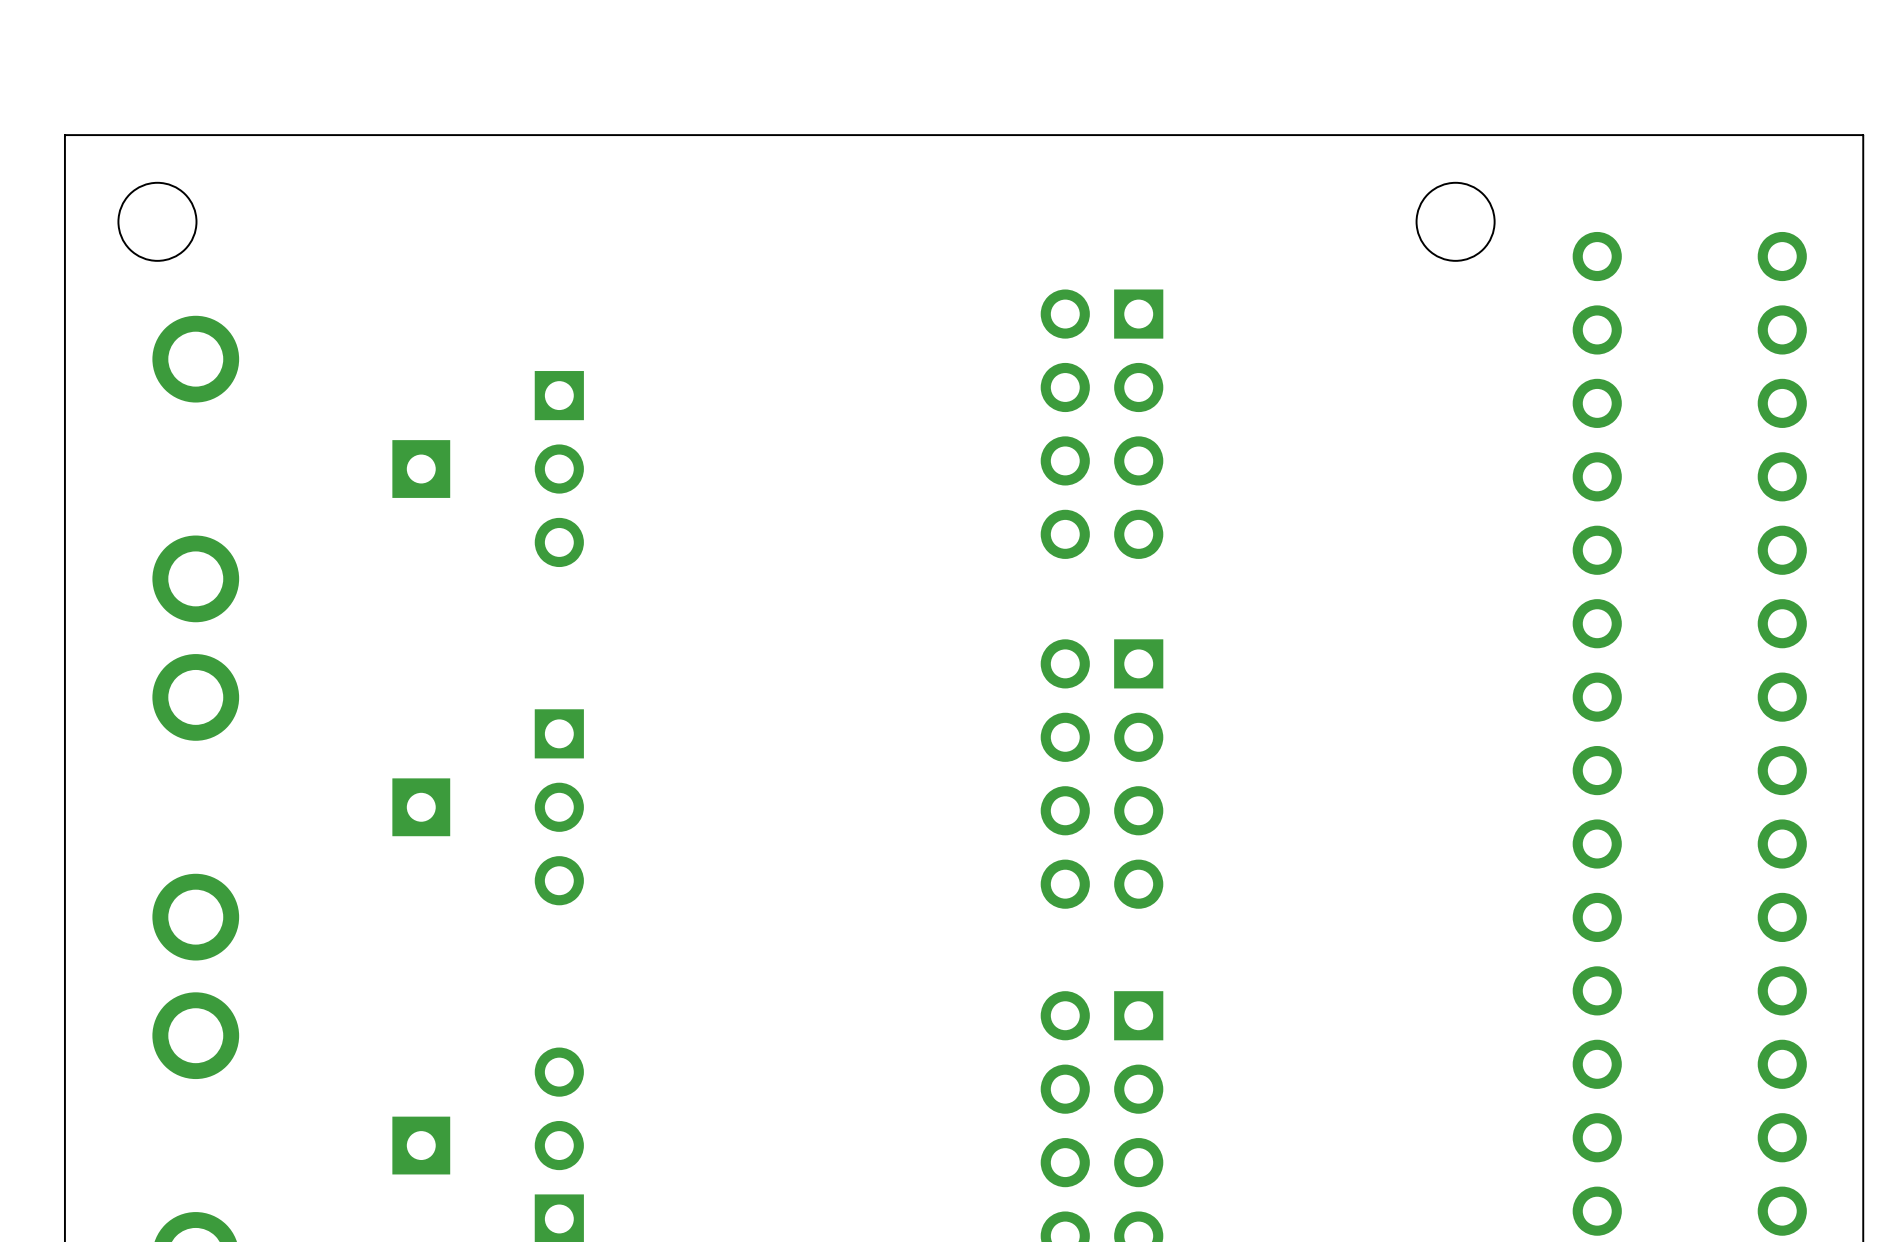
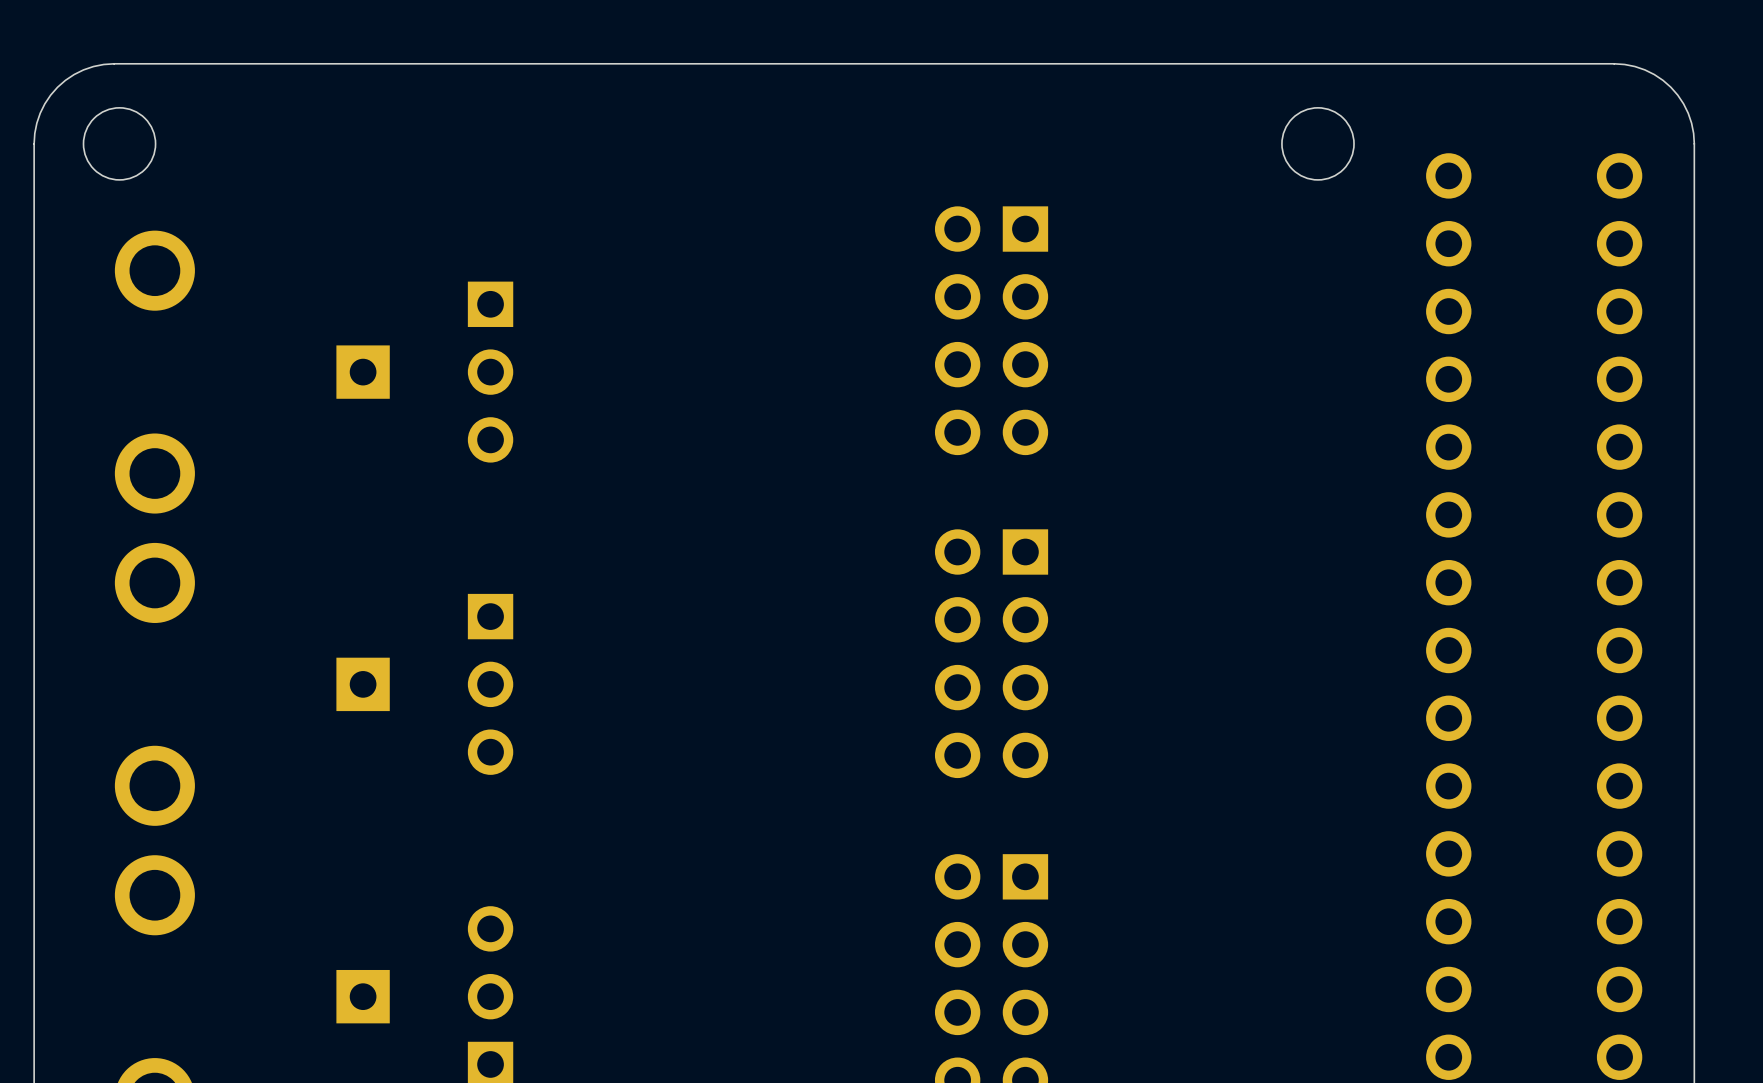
board edge: (151, 135) (64, 135) (64, 221) -> (114, 63) (83, 69) (57, 87) (40, 113) (34, 143)
board edge: (1776, 135) (1863, 135) (1863, 221) -> (1614, 63) (1644, 69) (1670, 87) (1688, 113) (1694, 143)

